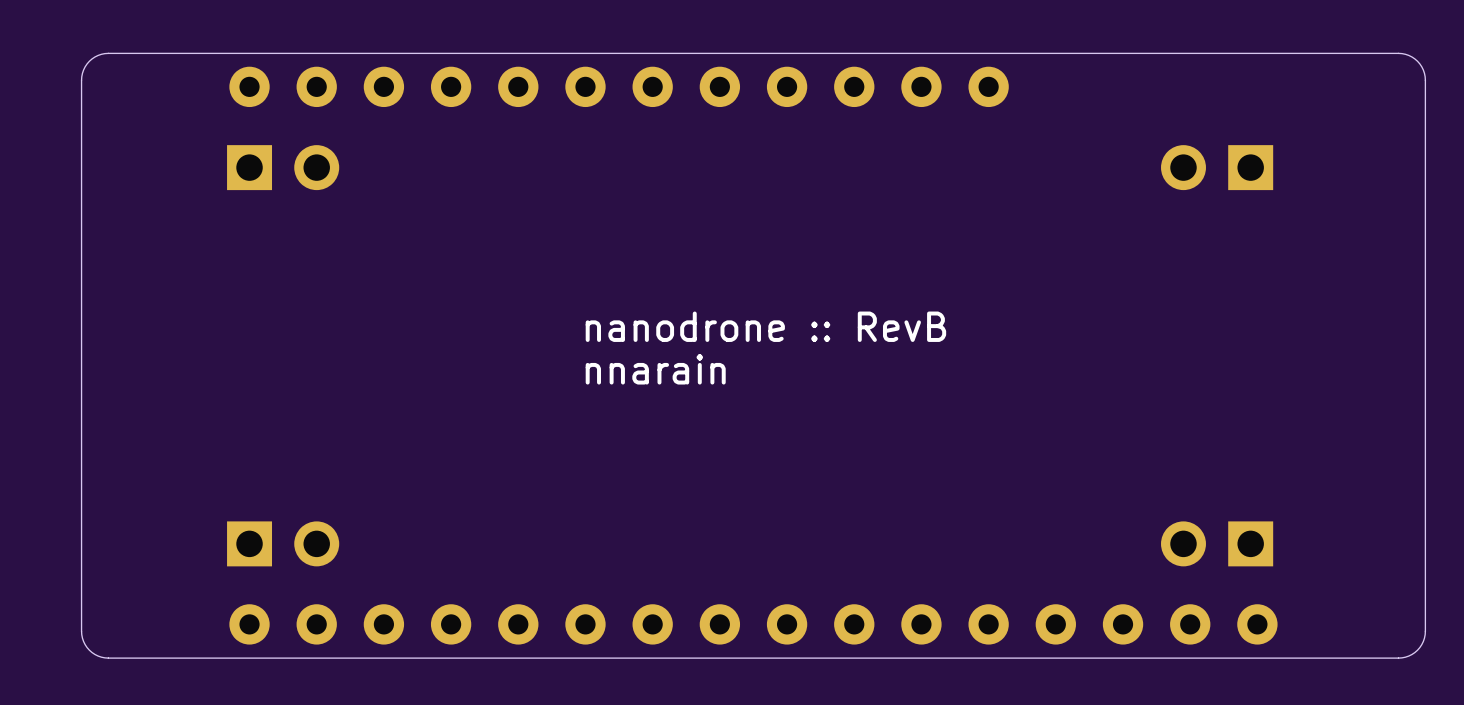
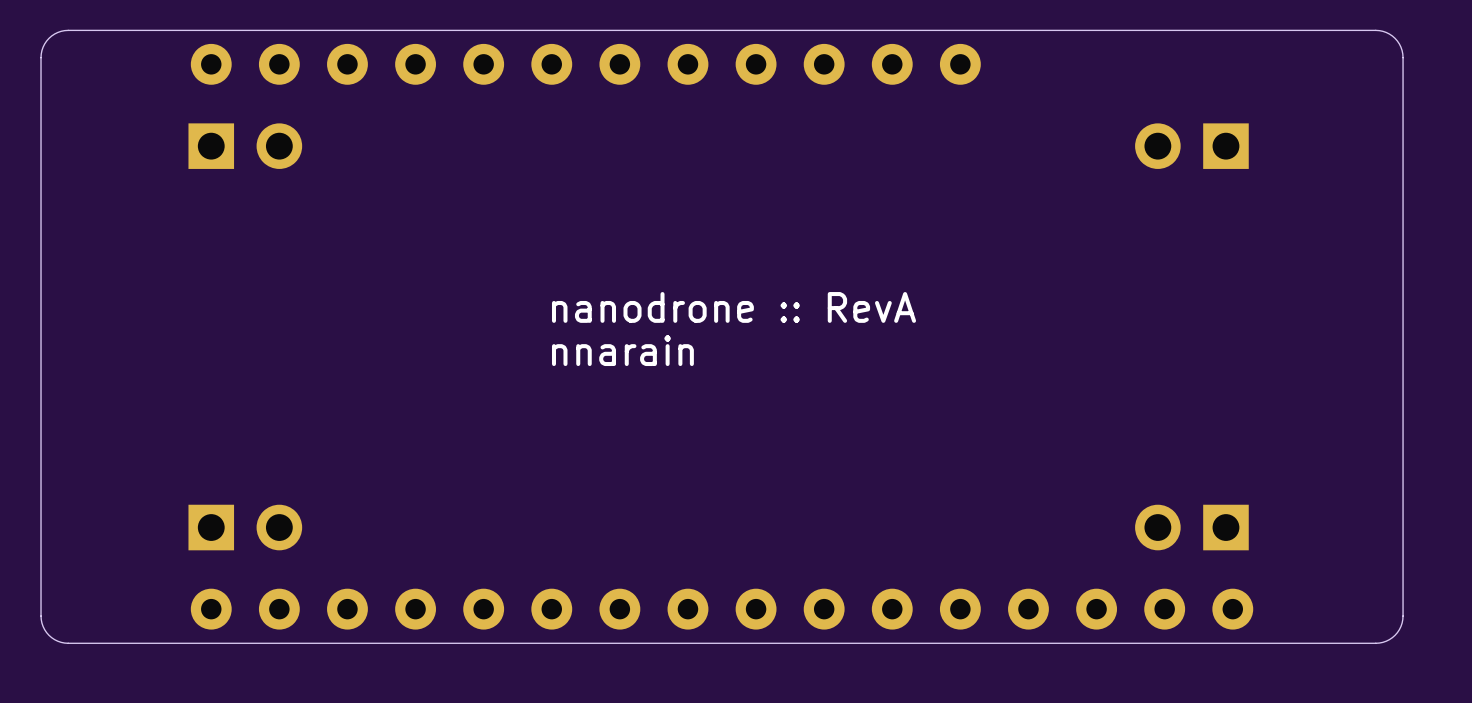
text: nanodrone :: RevB (765, 326) -> nanodrone :: RevA (734, 307)

